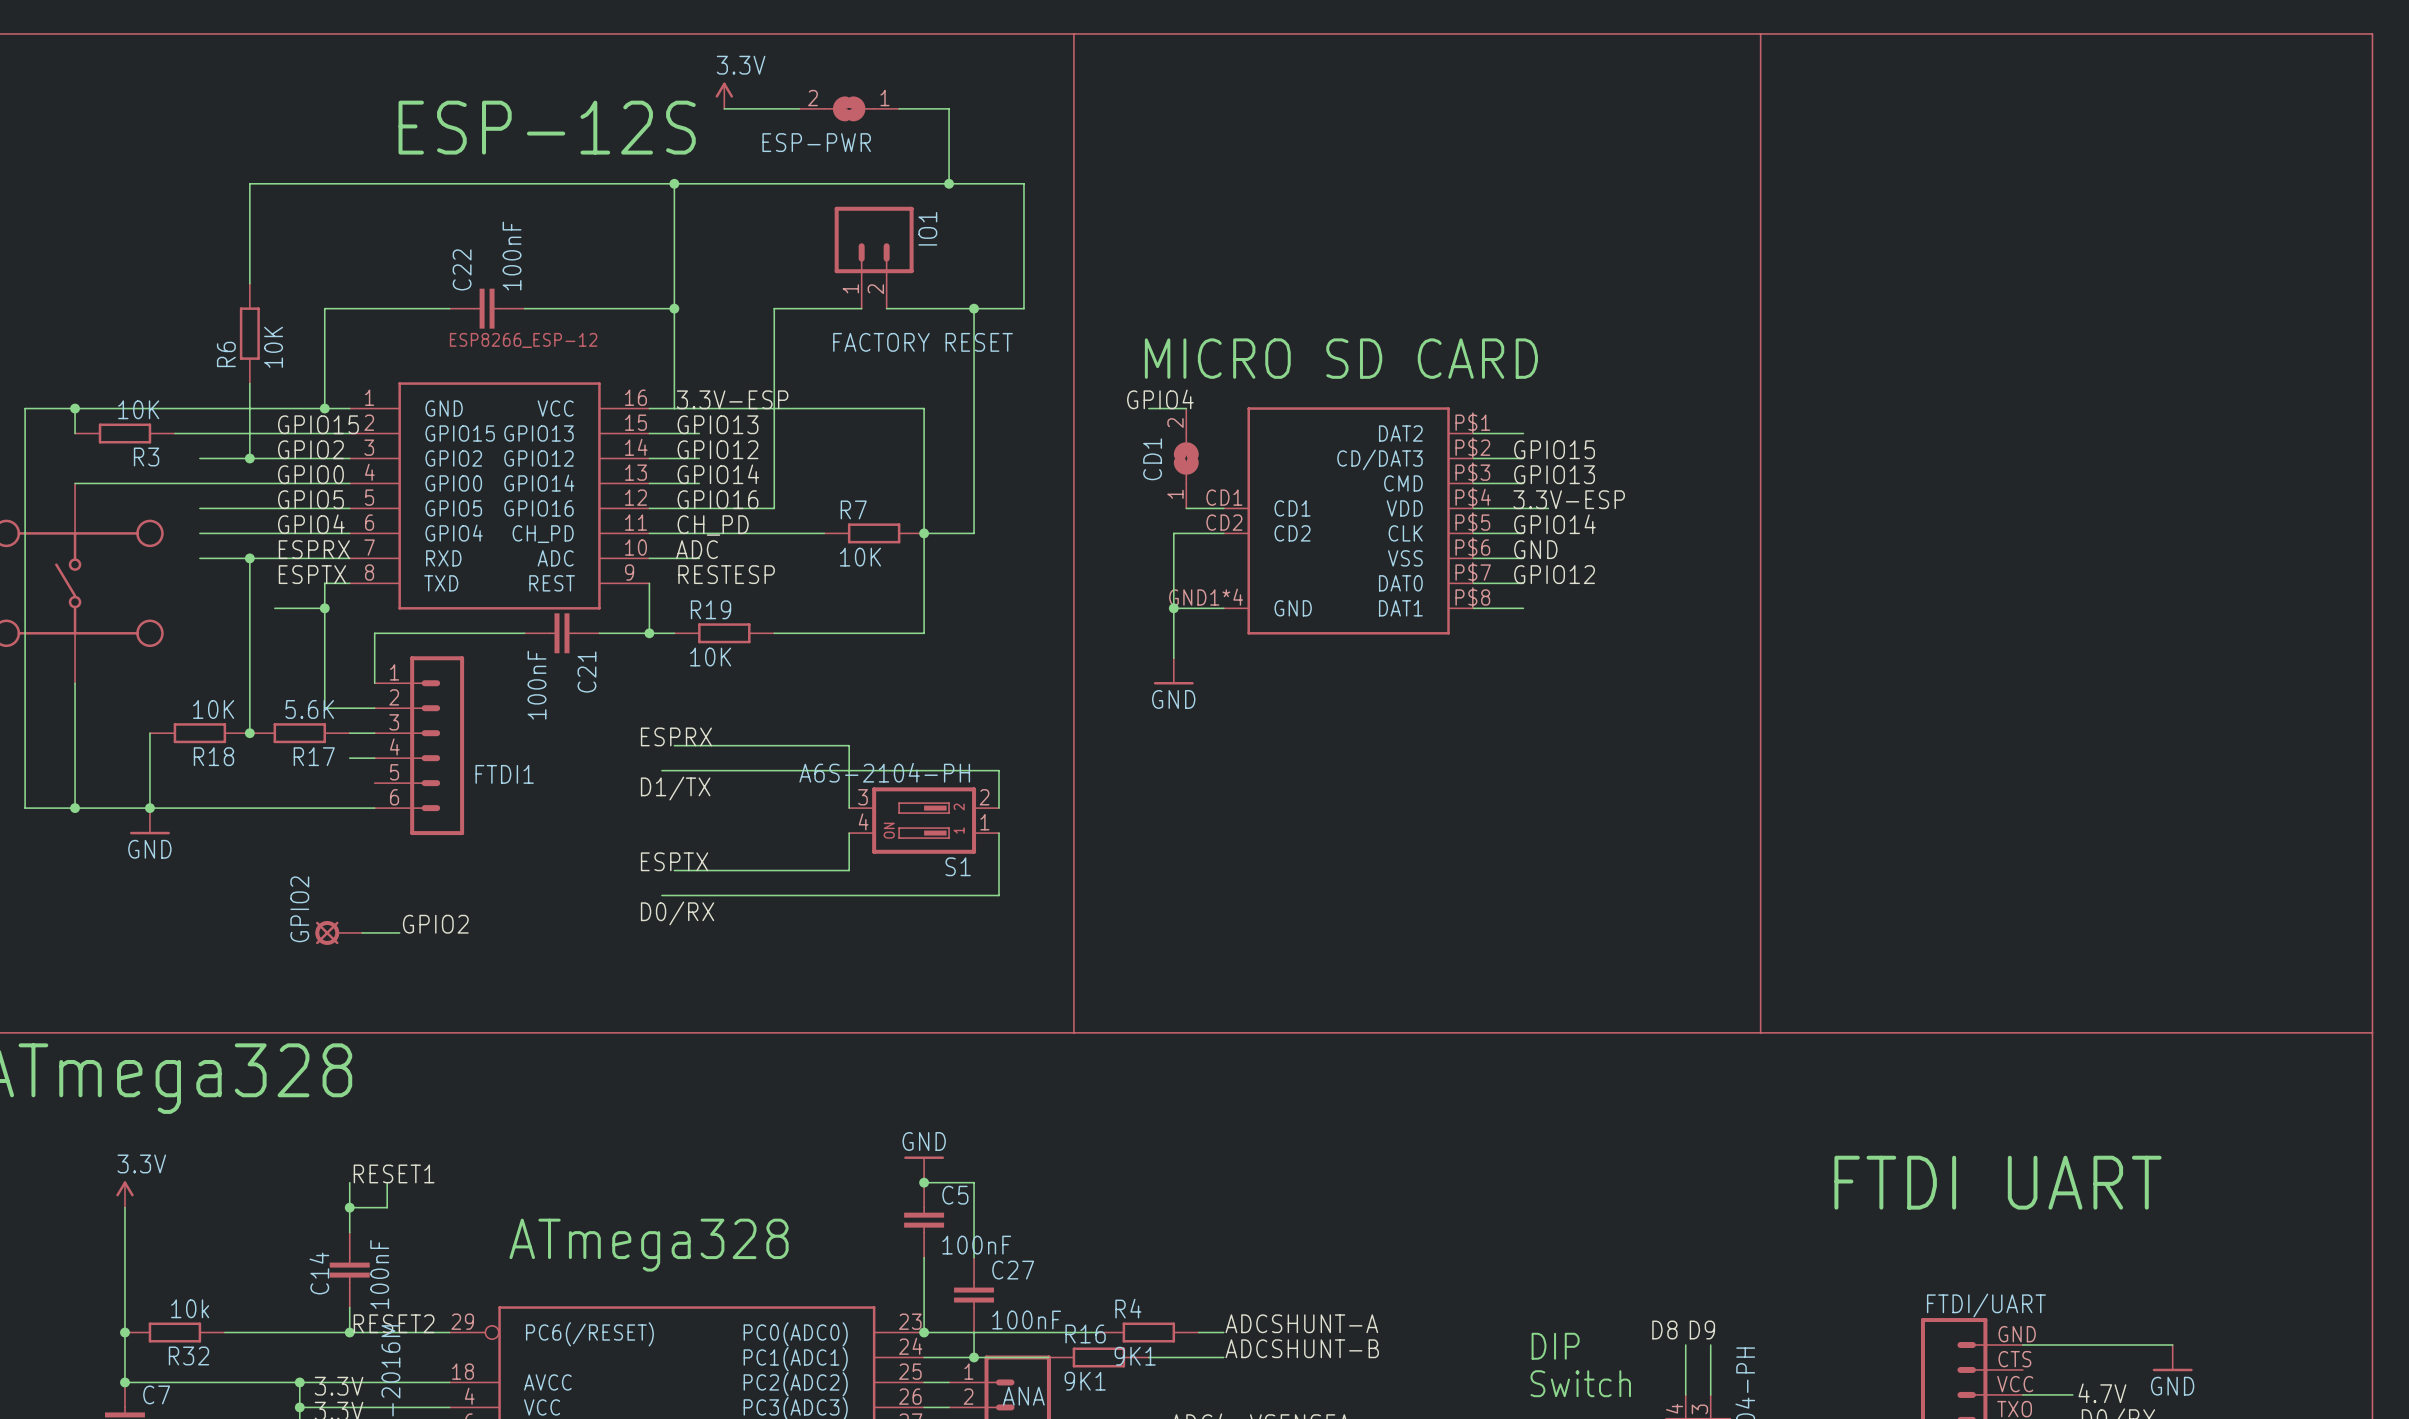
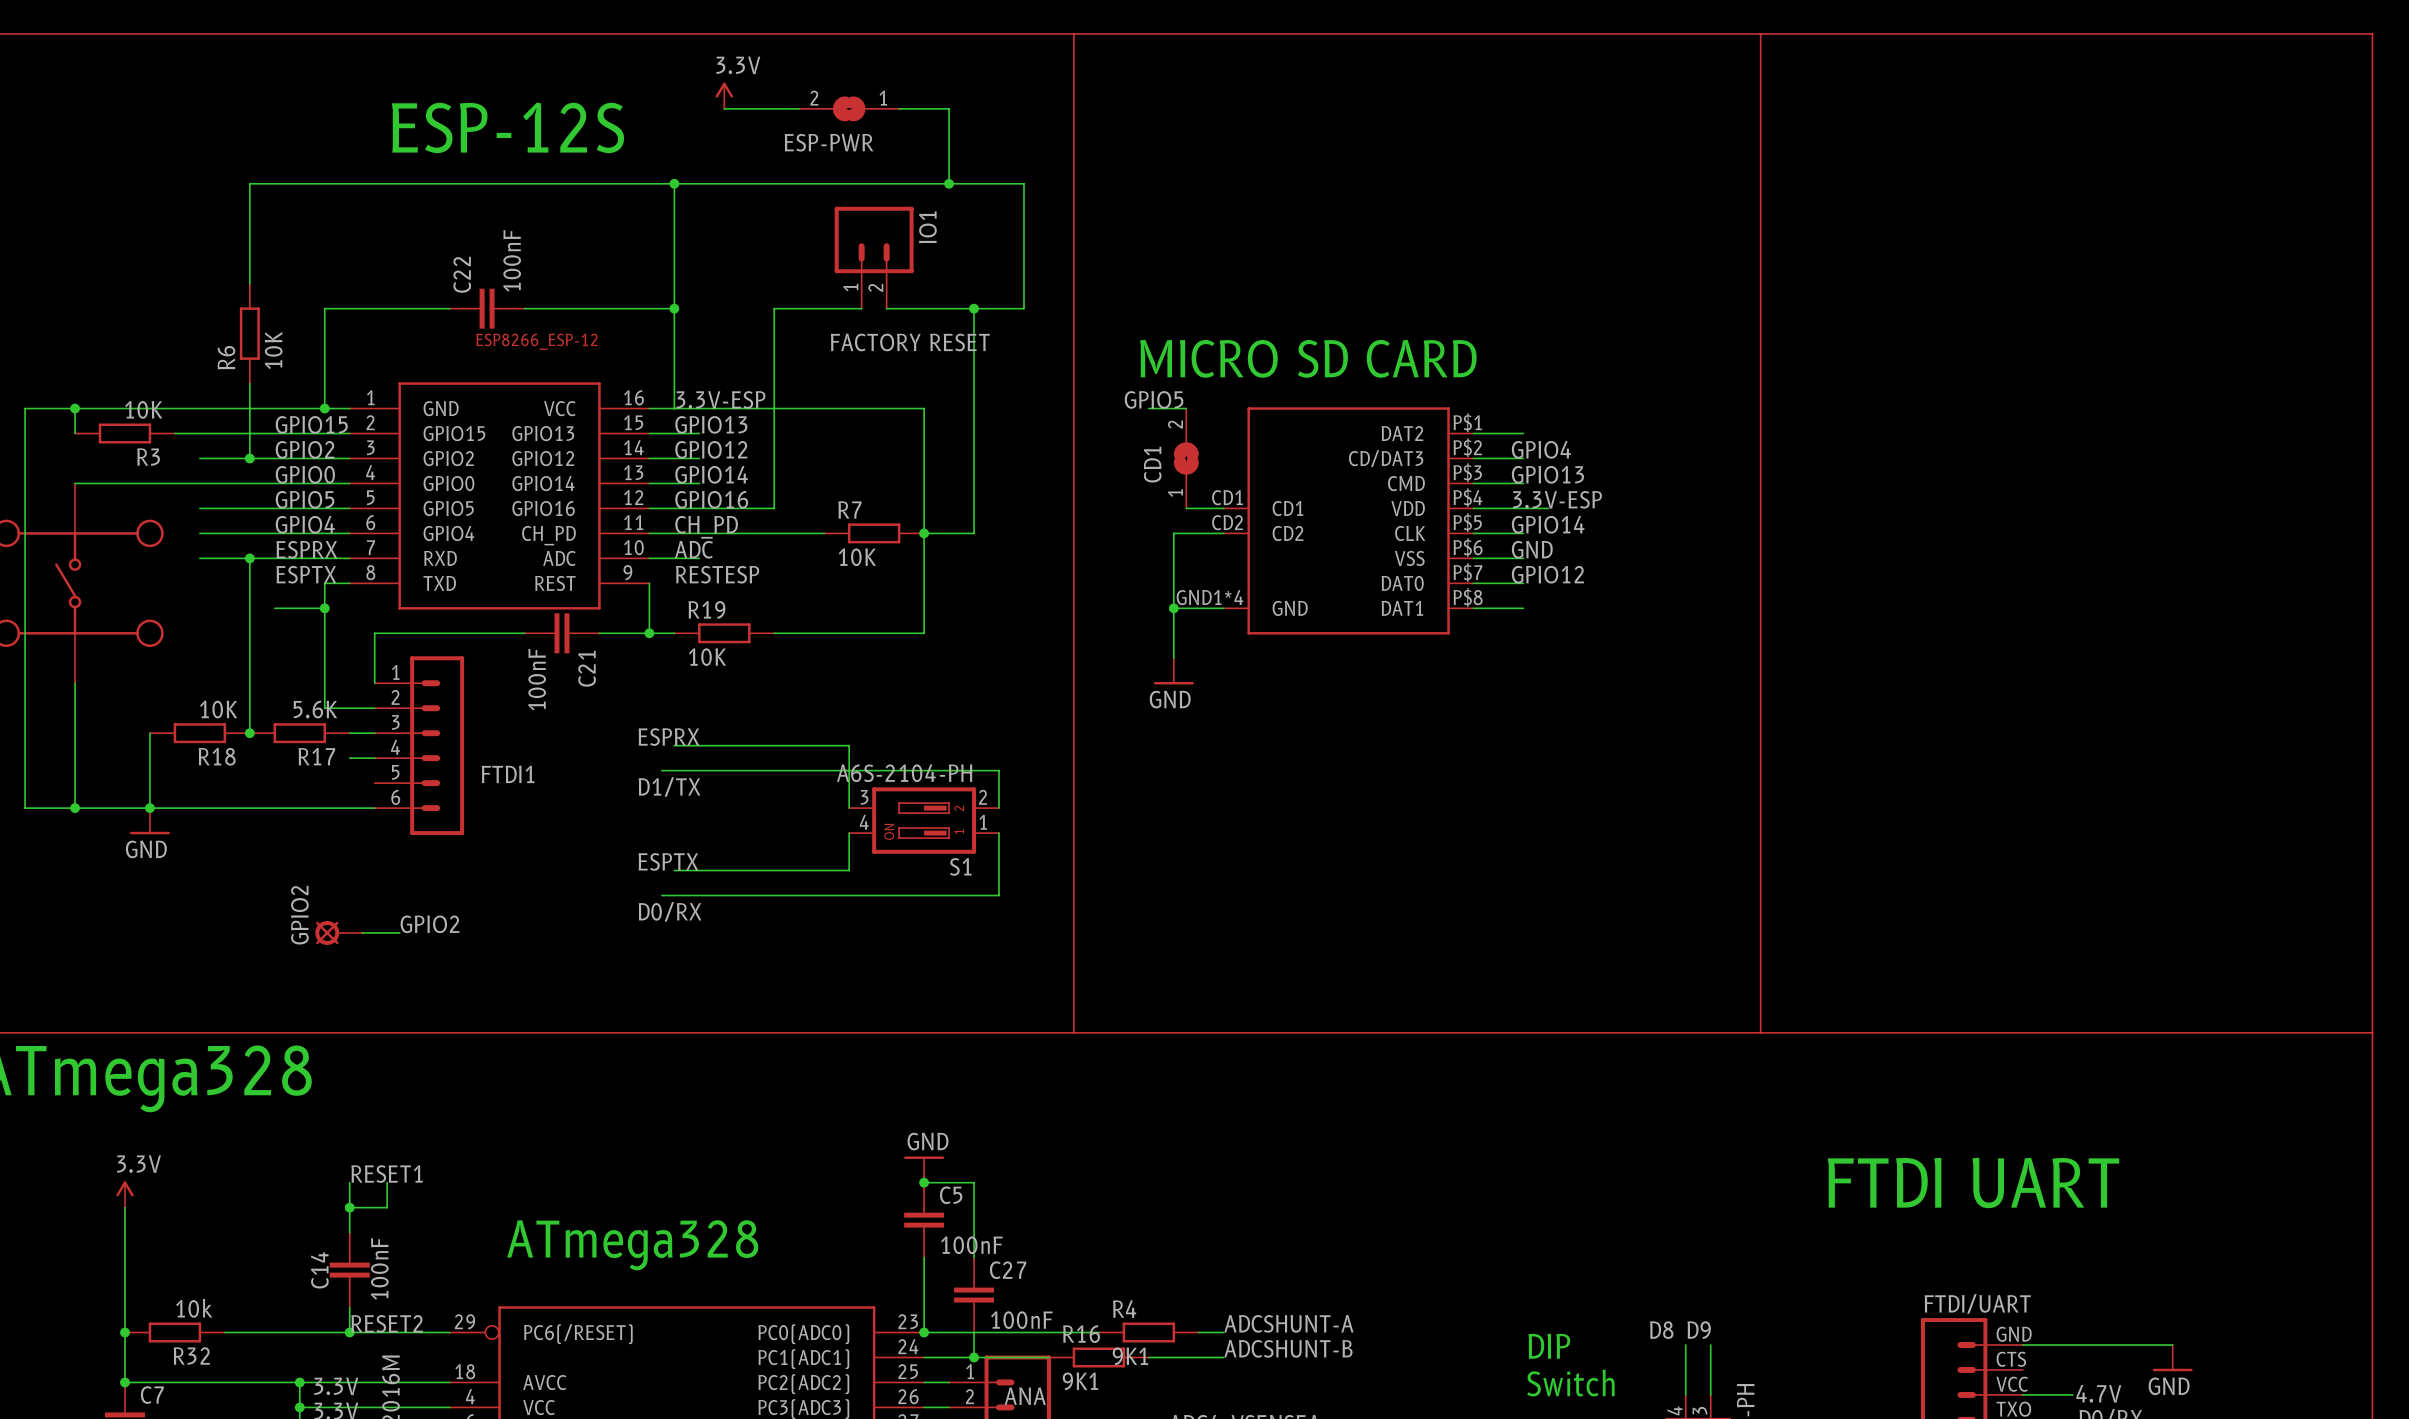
label: GPIO4 (1160, 399) -> GPIO5 (1154, 399)
label: GPIO15 (1554, 449) -> GPIO4 (1541, 449)

